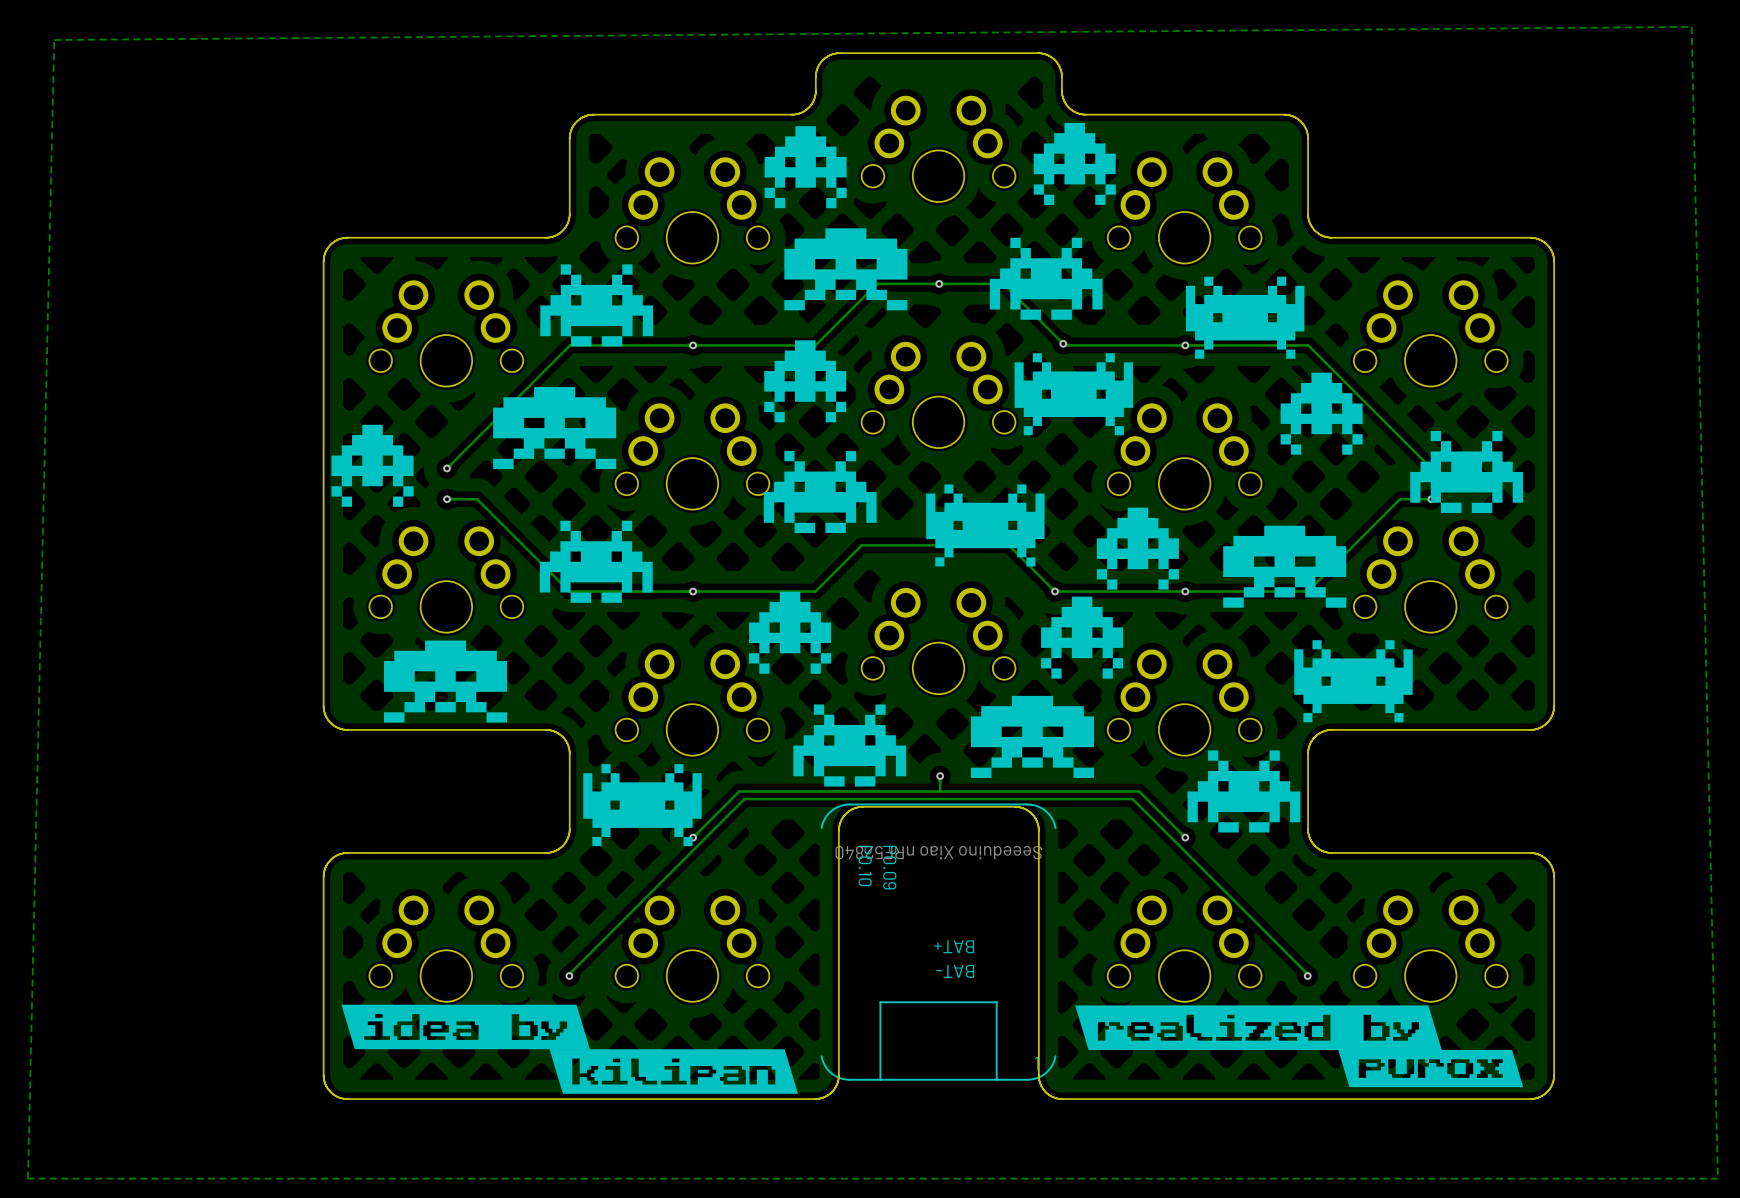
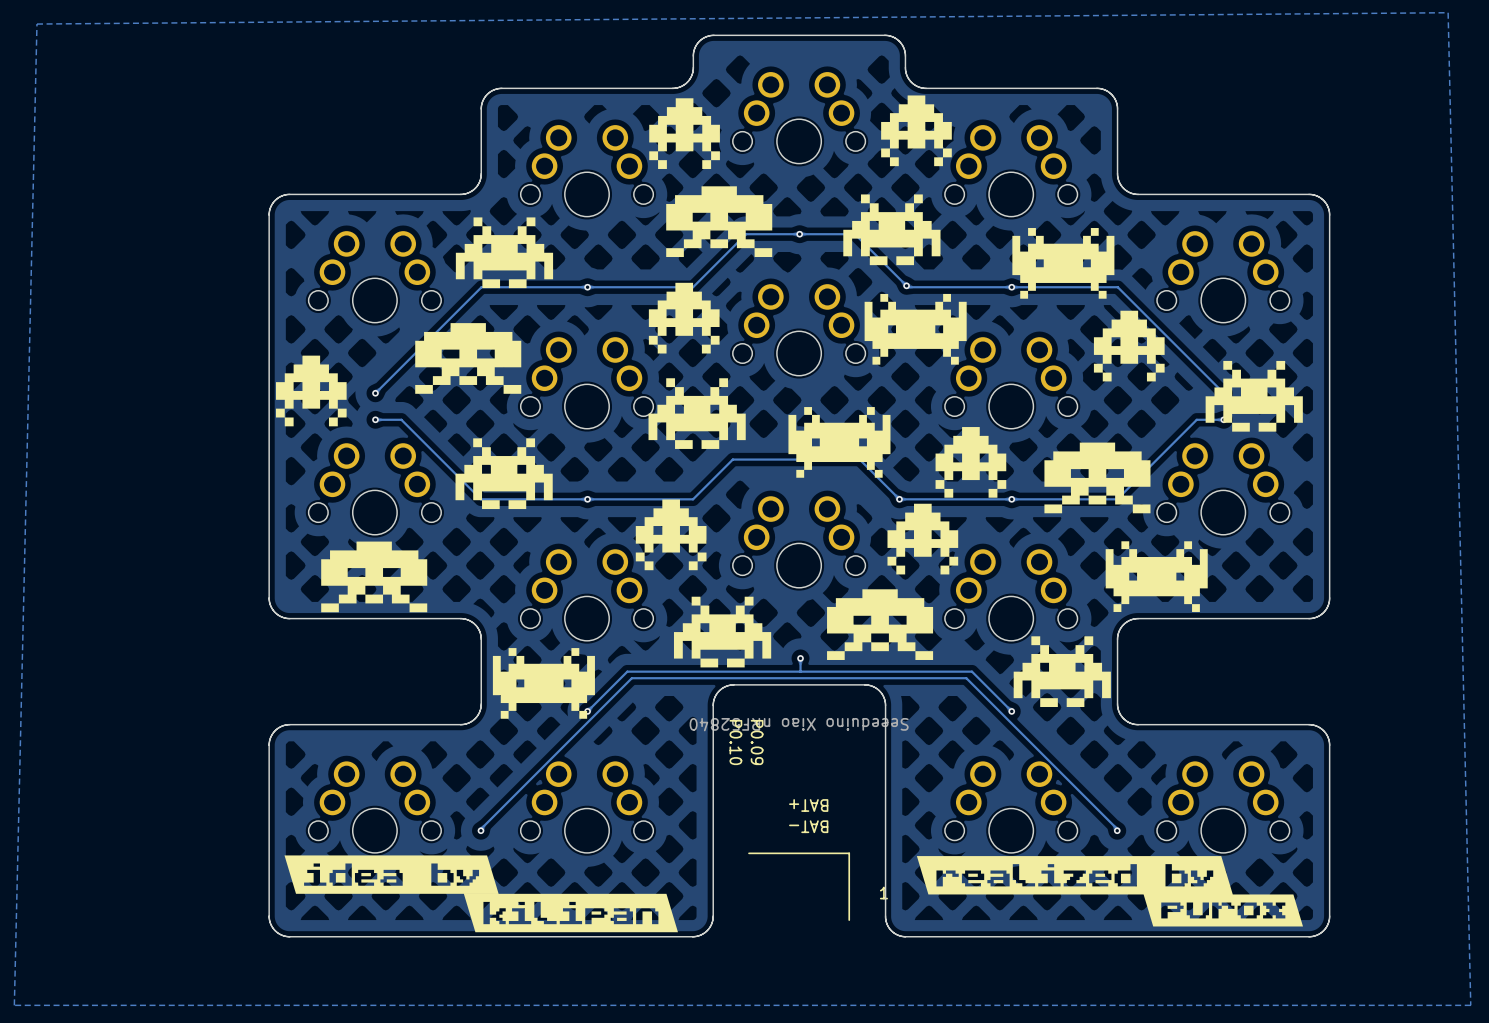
part: Seeeduino Xiao nRF52840 (938, 942) -> none
part: none -> Seeeduino Xiao nRF52840 (799, 886)

